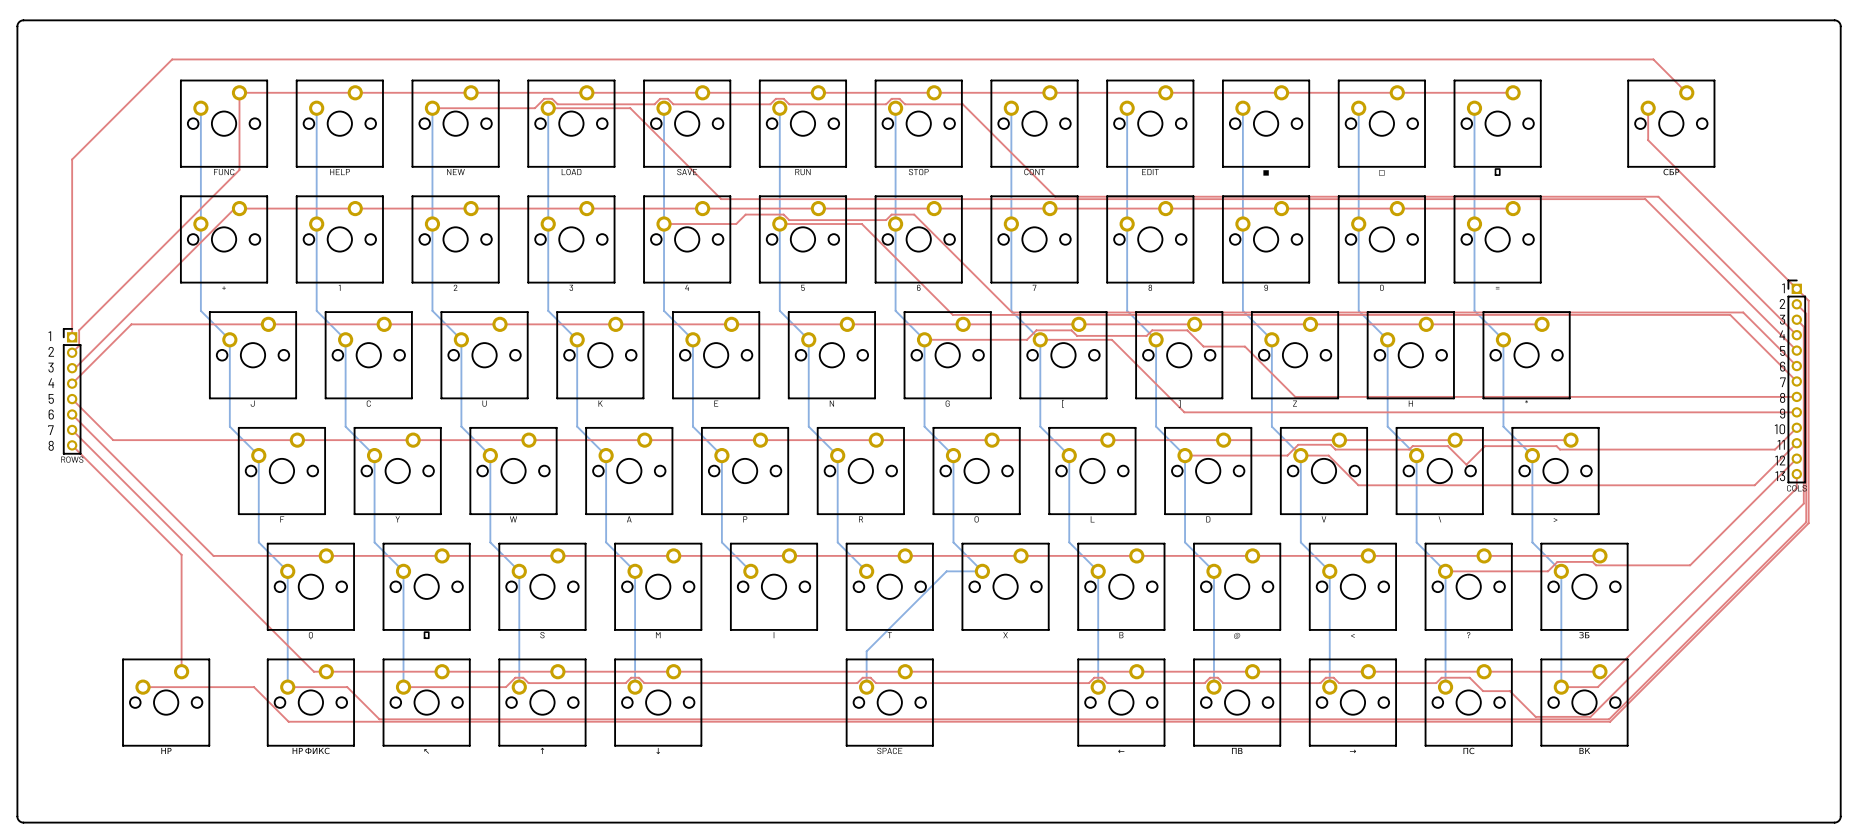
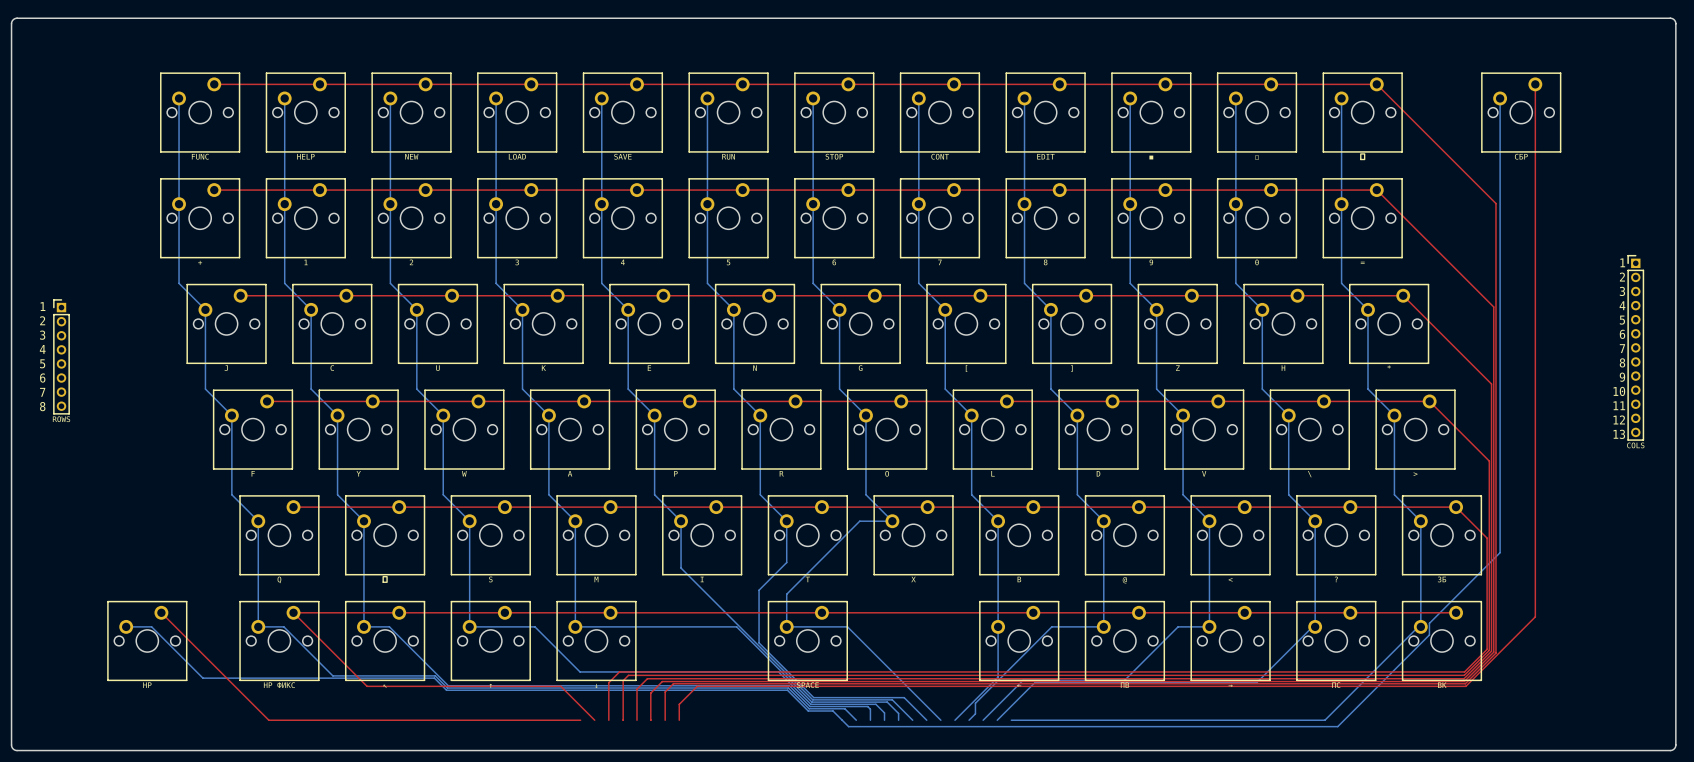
top track: (239, 92) (239, 169) (79, 330) (79, 345) (72, 352) -> none
top track: none -> (1376, 84) (1495, 203) (1495, 653) (1465, 683) (673, 683) (665, 691) (665, 720)
top track: (1686, 92) (1653, 59) (172, 59) (72, 159) (72, 337) -> (1535, 84) (1535, 616) (1465, 686) (697, 686) (679, 704) (679, 720)
top track: (432, 108) (534, 108) (544, 98) (552, 98) (557, 104) (654, 104) (660, 98) (667, 98) (673, 104) (770, 104) (775, 98) (783, 98) (789, 104) (886, 104) (891, 98) (899, 98) (905, 104) (962, 104) (1055, 196) (1658, 196) (1796, 335) -> none
top track: (548, 108) (630, 108) (721, 199) (1645, 199) (1796, 350) -> none
top track: (1648, 108) (1648, 140) (1808, 300) (1808, 523) (1610, 721) (288, 721) (254, 687) (143, 687) -> none
bottom track: none -> (1500, 98) (1500, 552) (1429, 623) (1429, 634) (1337, 726) (848, 726) (832, 711) (808, 711) (787, 690) (446, 690) (434, 678) (202, 678) (151, 626) (126, 626)
top track: (239, 208) (234, 208) (75, 368) (72, 368) -> none
top track: none -> (1376, 190) (1493, 307) (1493, 652) (1464, 681) (662, 681) (650, 693) (651, 720)
top track: (664, 224) (736, 224) (745, 214) (783, 214) (789, 220) (886, 220) (891, 214) (914, 214) (1012, 312) (1743, 312) (1796, 366) -> none
top track: (779, 224) (861, 224) (952, 314) (1730, 314) (1796, 381) -> none
top track: (1796, 304) (1806, 313) (1806, 522) (1609, 719) (379, 719) (347, 687) (287, 687) -> none
top track: (1796, 319) (1803, 326) (1803, 503) (1590, 716) (1535, 716) (1509, 691) (1483, 691) (1469, 677) (1441, 677) (1436, 683) (1339, 683) (1333, 677) (1325, 677) (1320, 683) (1223, 683) (1217, 677) (1210, 677) (1204, 683) (1107, 683) (1102, 677) (1094, 677) (1088, 683) (875, 683) (870, 677) (862, 677) (857, 683) (644, 683) (638, 677) (631, 677) (625, 683) (528, 683) (523, 677) (515, 677) (505, 687) (403, 687) -> none
top track: (268, 324) (131, 324) (72, 383) -> none
top track: none -> (1403, 295) (1491, 384) (1491, 651) (1464, 678) (647, 678) (637, 689) (637, 720)
top track: (924, 339) (1026, 339) (1036, 330) (1071, 330) (1077, 335) (1146, 335) (1152, 330) (1187, 330) (1203, 346) (1244, 346) (1295, 396) (1796, 396) -> none
top track: (1040, 339) (1111, 339) (1184, 412) (1796, 412) -> none
top track: (72, 399) (113, 440) (297, 440) -> none
top track: (72, 414) (213, 555) (326, 555) -> none
top track: (1796, 427) (1775, 449) (1559, 449) (1556, 446) (1484, 446) (1466, 464) (1447, 446) (1412, 446) (1409, 449) (1335, 449) (1330, 444) (1298, 444) (1287, 455) (1185, 455) -> none
top track: (72, 429) (313, 671) (326, 671) -> (594, 720) (560, 686) (367, 686) (293, 612)
top track: none -> (1429, 401) (1489, 461) (1489, 650) (1464, 675) (628, 675) (623, 680) (622, 720)
top track: (1796, 443) (1754, 485) (1358, 485) (1328, 455) (1300, 455) -> none
top track: (72, 445) (181, 554) (181, 671) -> (580, 720) (268, 720) (161, 612)
top track: (1796, 458) (1690, 565) (1596, 565) (1592, 561) (1557, 561) (1548, 571) (1445, 571) -> none
top track: (1796, 474) (1796, 488) (1597, 687) (1561, 687) -> none
top track: none -> (1456, 507) (1487, 538) (1487, 649) (1464, 671) (619, 671) (608, 682) (608, 720)
bottom track: none -> (681, 521) (681, 568) (812, 699) (892, 699) (912, 720)
bottom track: none -> (786, 521) (786, 562) (759, 590) (759, 642) (813, 697) (904, 697) (926, 720)
bottom track: none -> (258, 626) (283, 626) (332, 675) (435, 675) (447, 688) (788, 688) (809, 708) (844, 708) (856, 720)
bottom track: none -> (363, 626) (389, 626) (448, 685) (789, 685) (810, 706) (867, 706) (870, 709) (870, 720)
bottom track: none -> (469, 626) (534, 626) (580, 671) (778, 671) (811, 704) (875, 704) (884, 712) (884, 720)
bottom track: none -> (575, 626) (736, 626) (811, 702) (887, 702) (898, 713) (898, 720)
bottom track: none -> (786, 626) (847, 626) (940, 720)
bottom track: none -> (998, 626) (998, 677) (954, 720)
bottom track: none -> (1103, 626) (1051, 626) (975, 703) (975, 713) (969, 720)
bottom track: none -> (1209, 626) (1178, 626) (1124, 680) (1022, 680) (983, 720)
bottom track: none -> (1315, 626) (1312, 626) (1256, 682) (1034, 682) (997, 720)
bottom track: none -> (1420, 626) (1418, 626) (1324, 720) (1011, 720)

